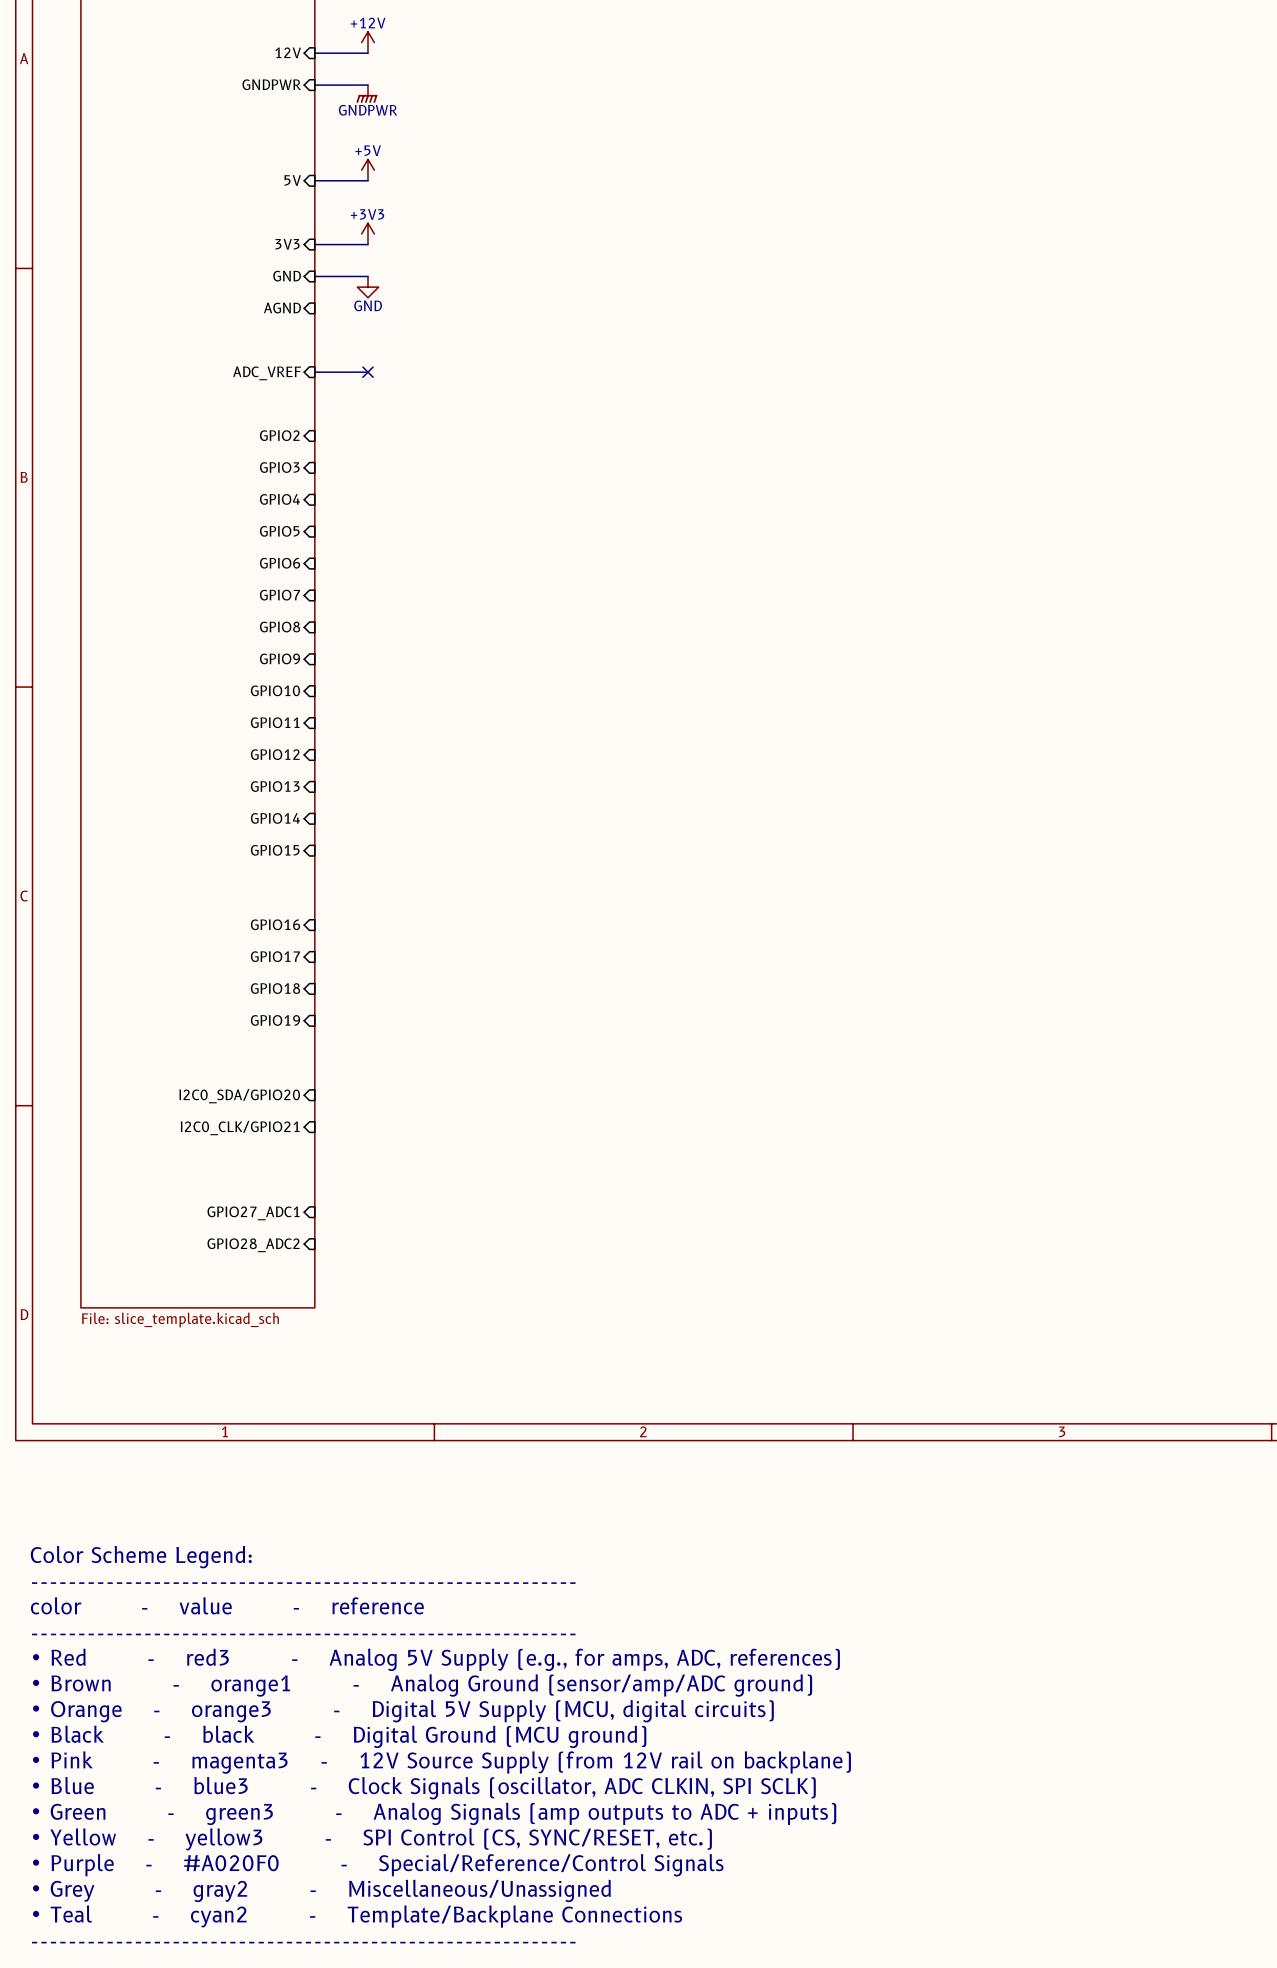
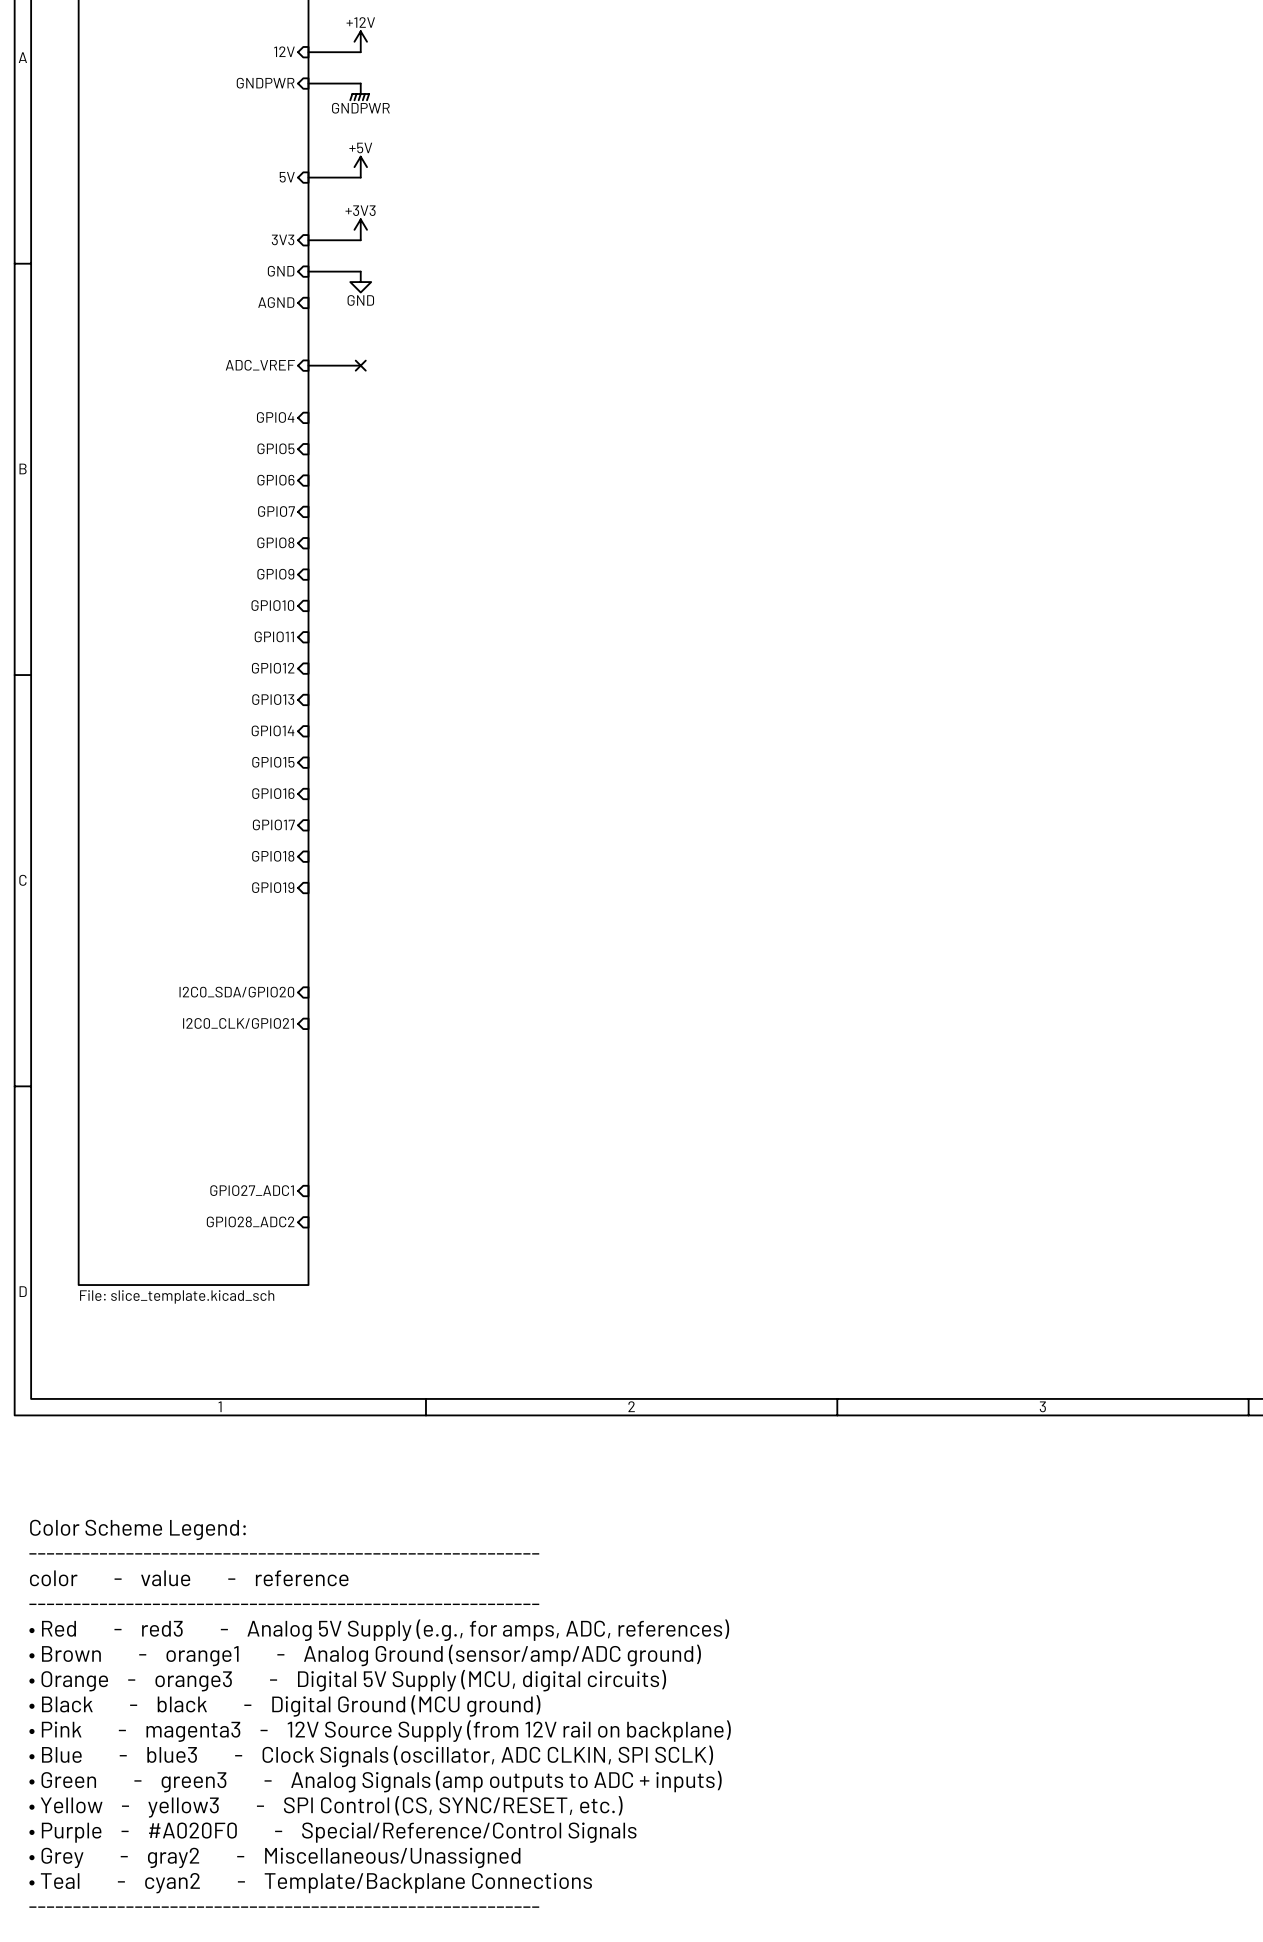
sheet pin: GPIO2 (279, 435) -> none
sheet pin: GPIO3 (279, 467) -> none
sheet pin position: GPIO4 (279, 499) -> GPIO4 (275, 417)
sheet pin position: GPIO5 (279, 531) -> GPIO5 (276, 448)
sheet pin position: GPIO6 (280, 563) -> GPIO6 (275, 480)
sheet pin position: GPIO7 (279, 595) -> GPIO7 (276, 511)
sheet pin position: GPIO8 (280, 627) -> GPIO8 (275, 542)
sheet pin position: GPIO9 (280, 658) -> GPIO9 (275, 574)
sheet pin position: GPIO10 (275, 690) -> GPIO10 (272, 605)
sheet pin position: GPIO11 (275, 722) -> GPIO11 (274, 636)
sheet pin position: GPIO12 (275, 754) -> GPIO12 (273, 668)
sheet pin position: GPIO13 (275, 786) -> GPIO13 (273, 699)
sheet pin position: GPIO14 (275, 818) -> GPIO14 (273, 730)
sheet pin position: GPIO15 (275, 850) -> GPIO15 (273, 762)
sheet pin position: GPIO16 (275, 924) -> GPIO16 (273, 793)
sheet pin position: GPIO17 (275, 956) -> GPIO17 (273, 824)
sheet pin position: GPIO18 (275, 988) -> GPIO18 (273, 856)
sheet pin position: GPIO19 (275, 1020) -> GPIO19 (273, 887)
sheet pin position: I2C0_SDA/GPIO20 (239, 1096) -> I2C0_SDA/GPIO20 (236, 992)
sheet pin position: I2C0_CLK/GPIO21 (240, 1128) -> I2C0_CLK/GPIO21 (238, 1023)

